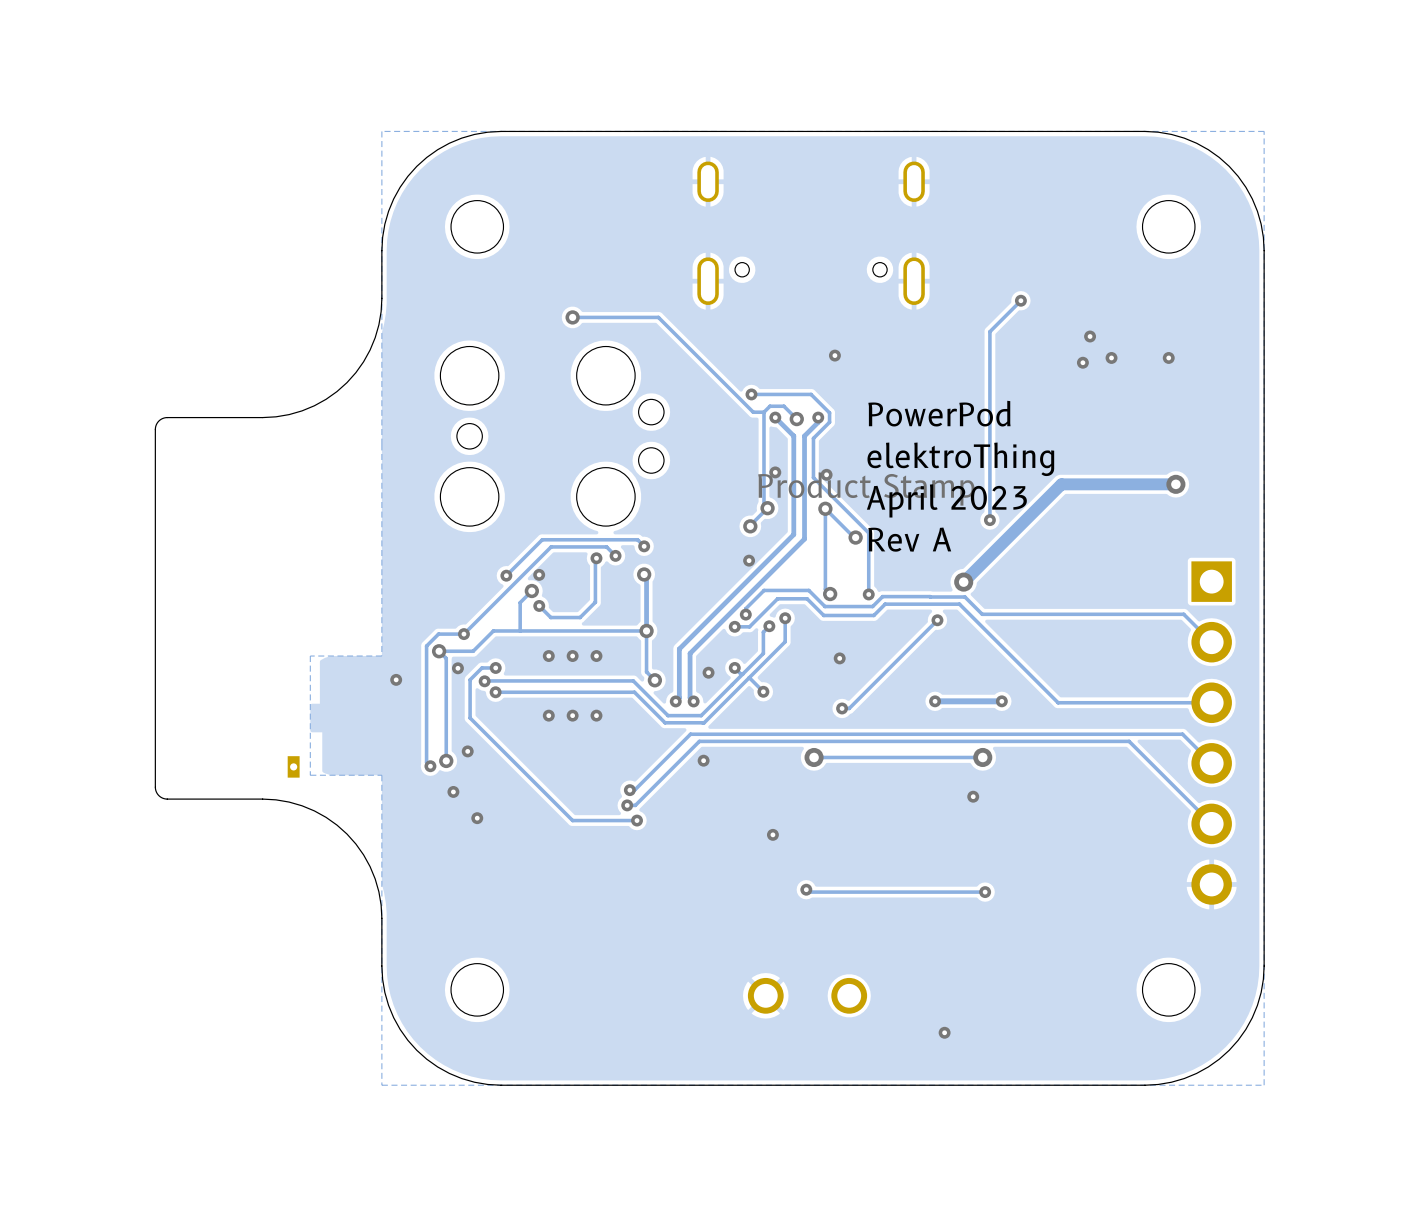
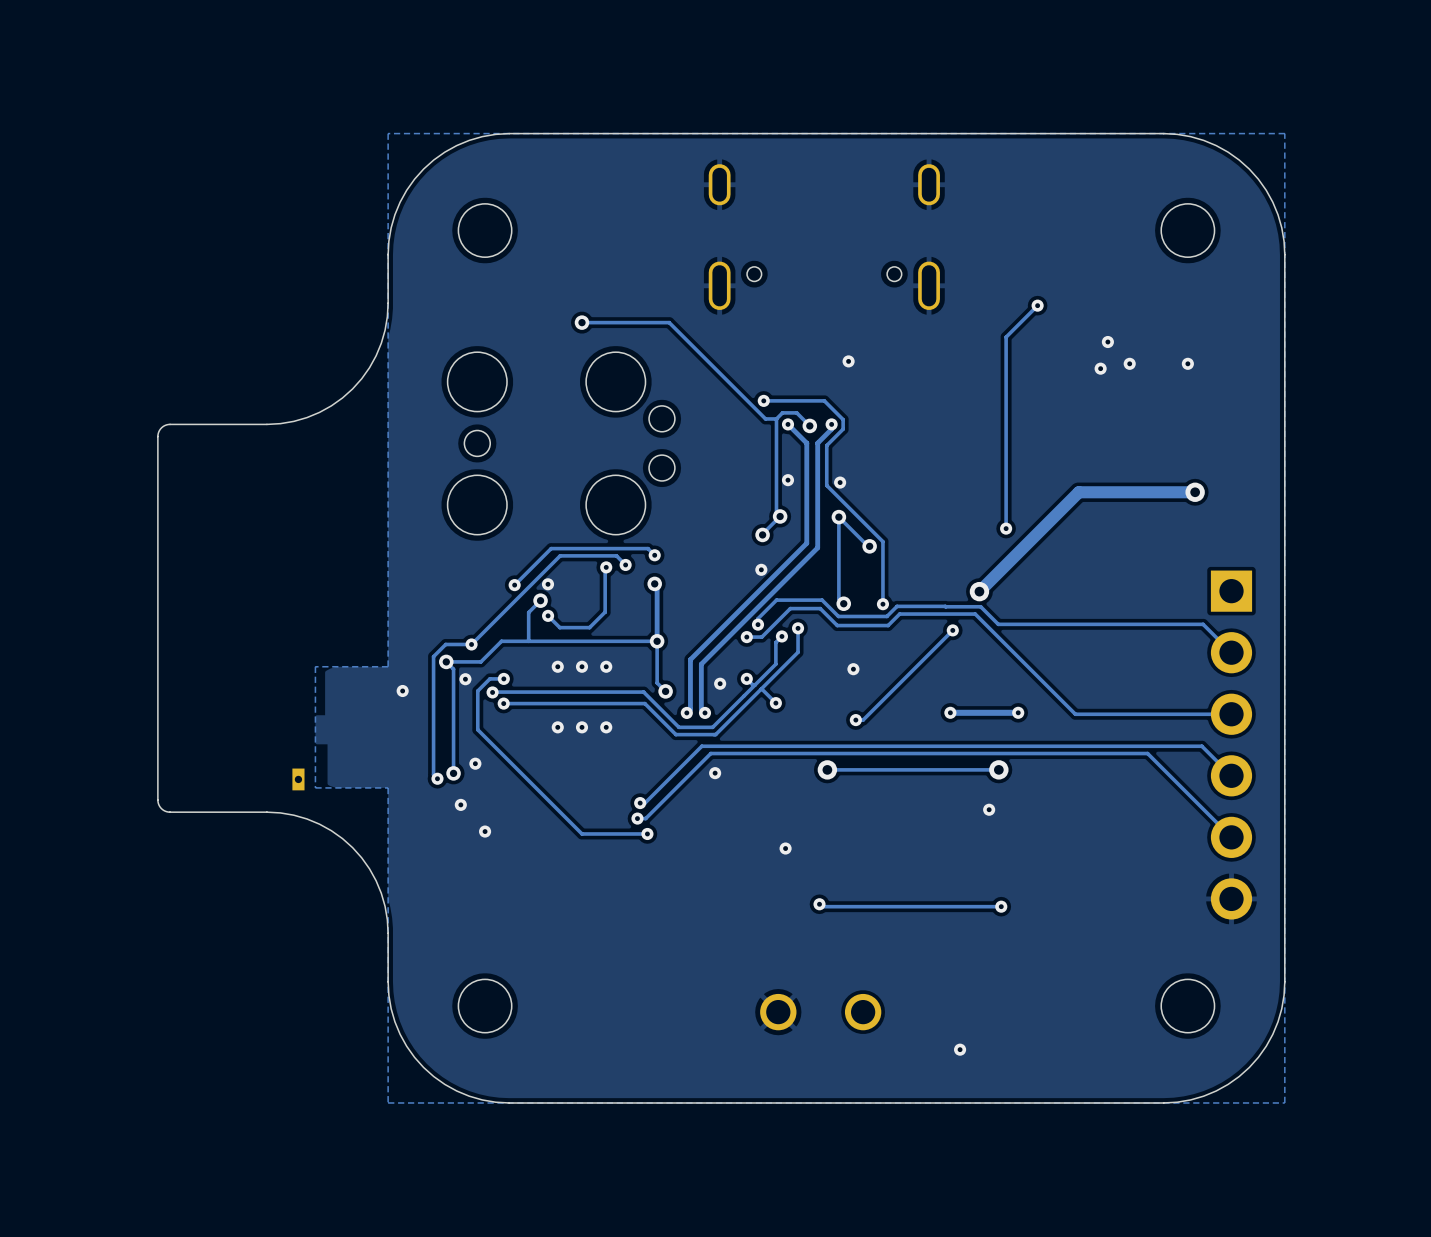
drawing: [758, 400, 1055, 552] -> none

